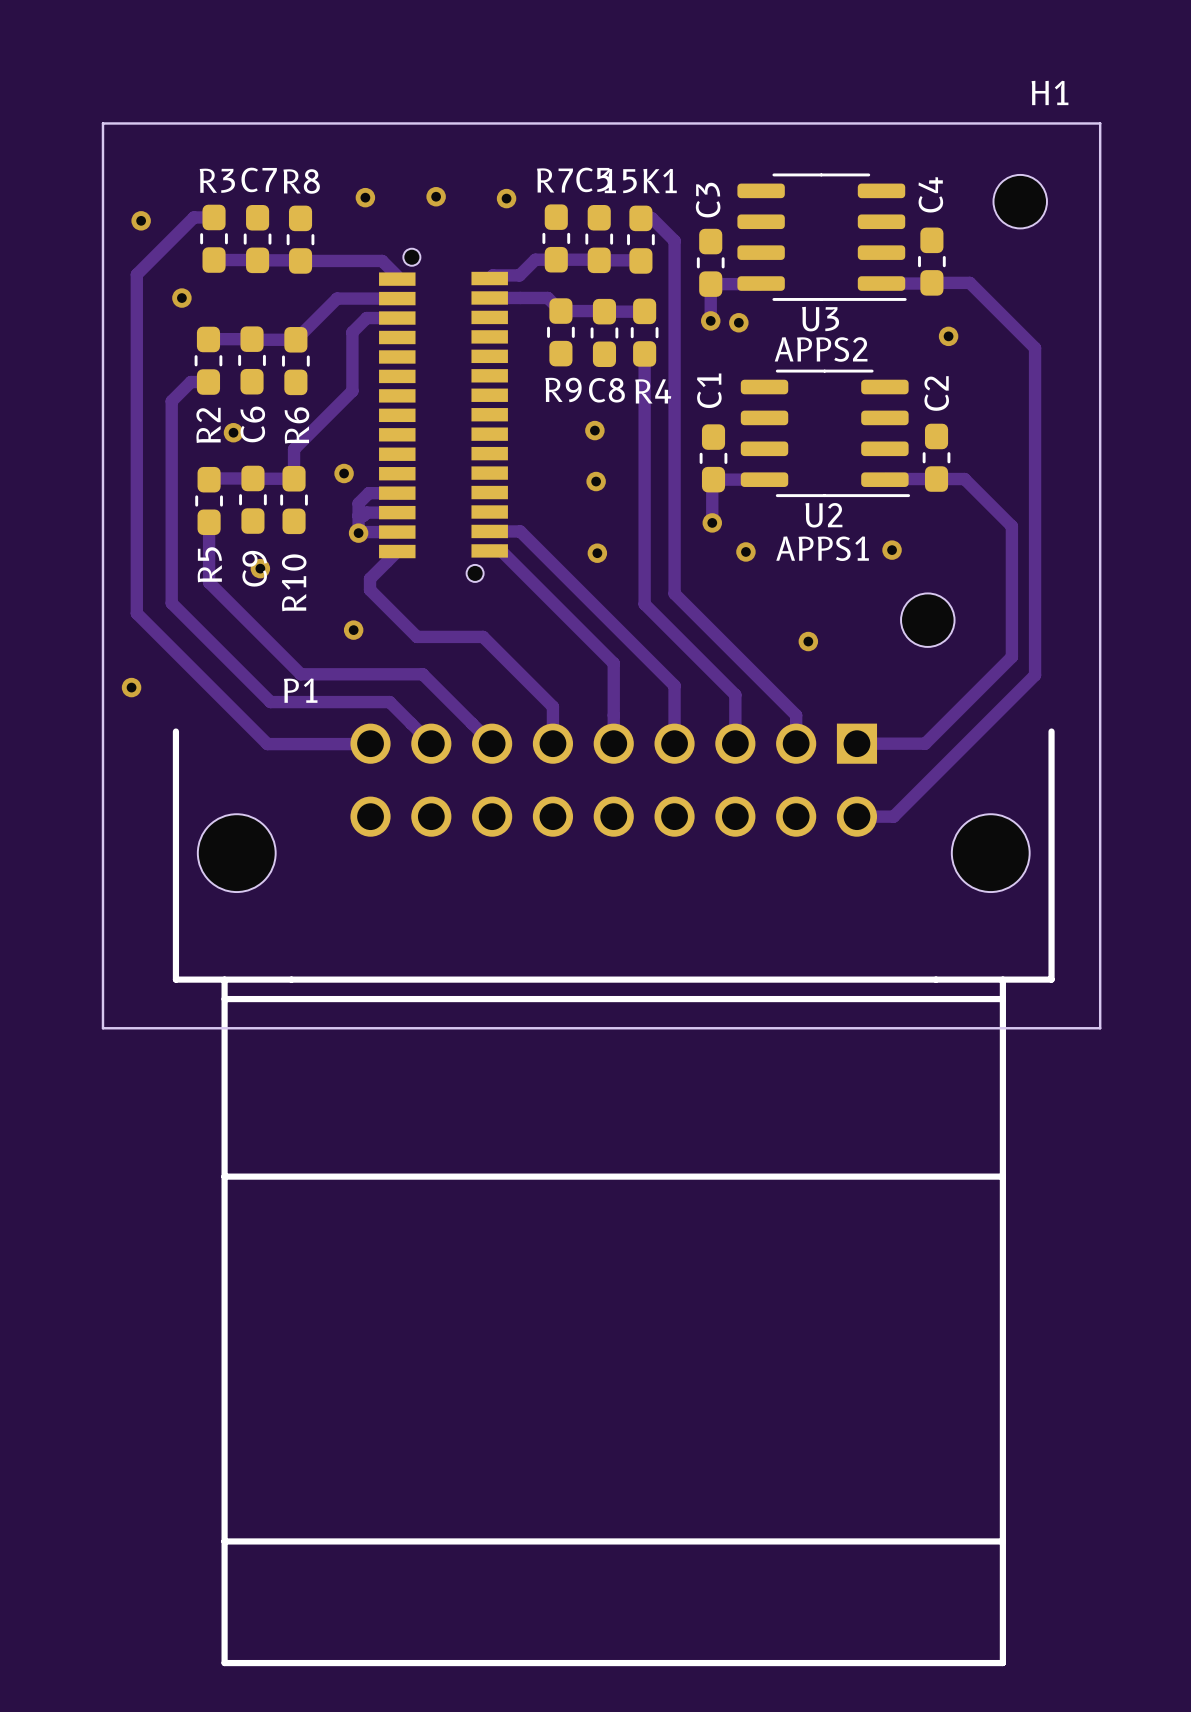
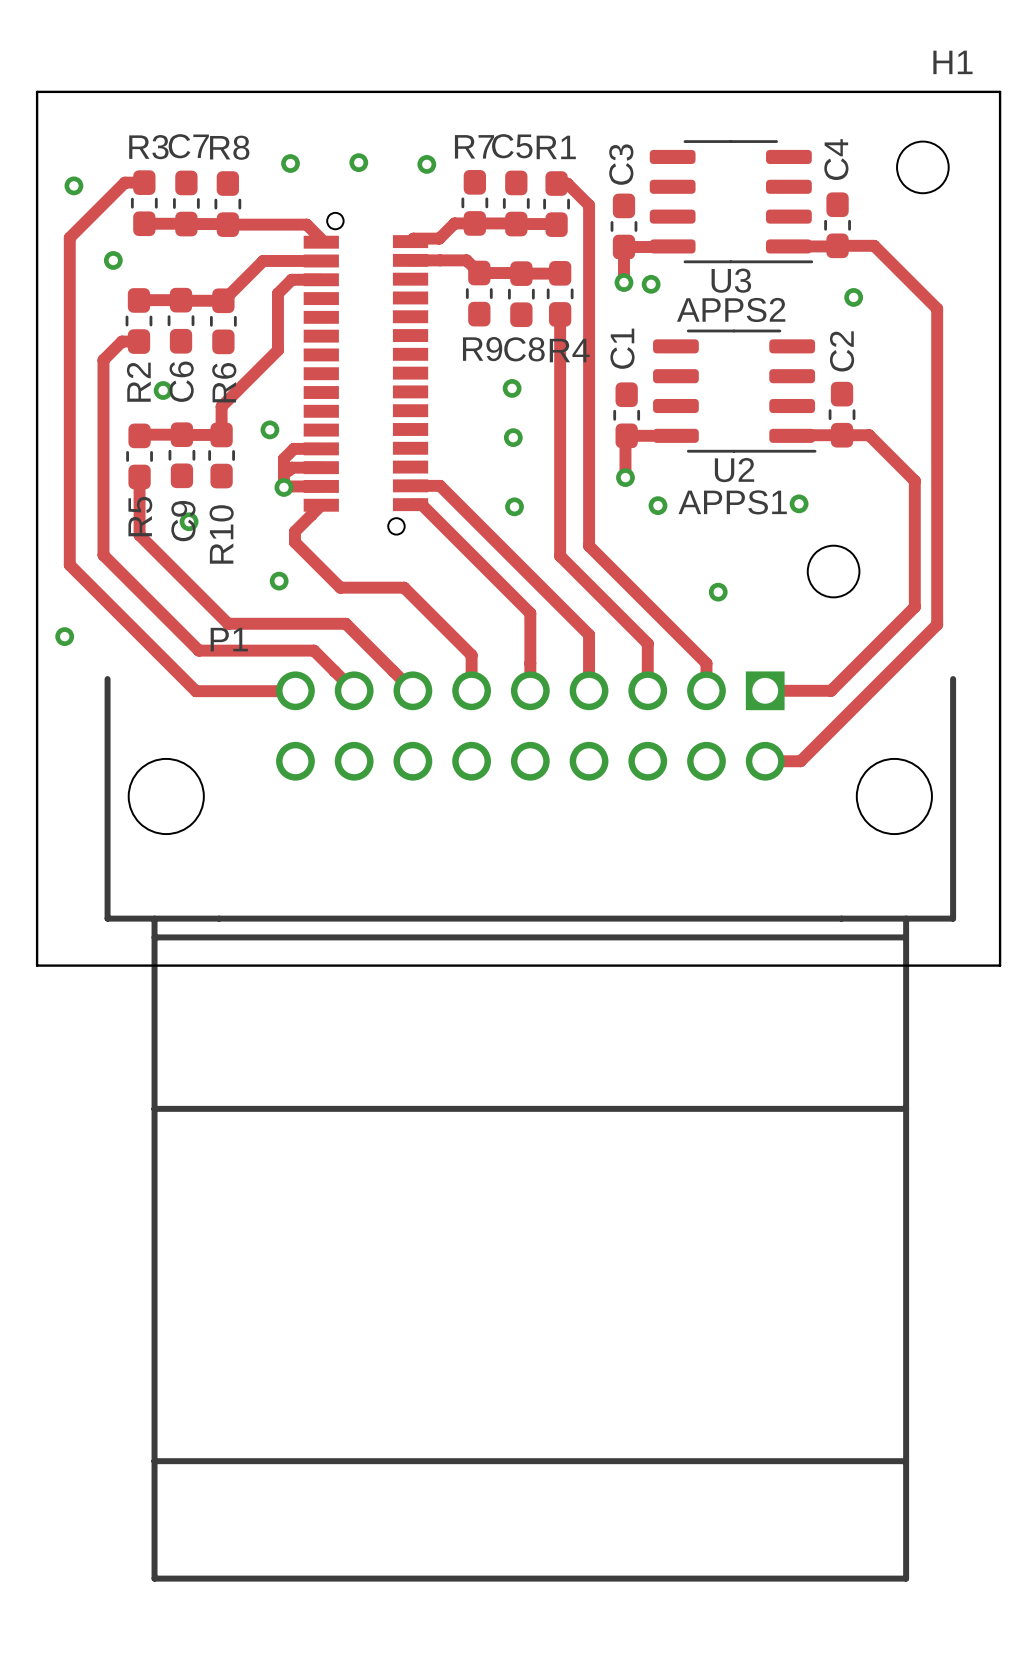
15K1 name: 15K1 (639, 181) -> R1 (556, 147)

